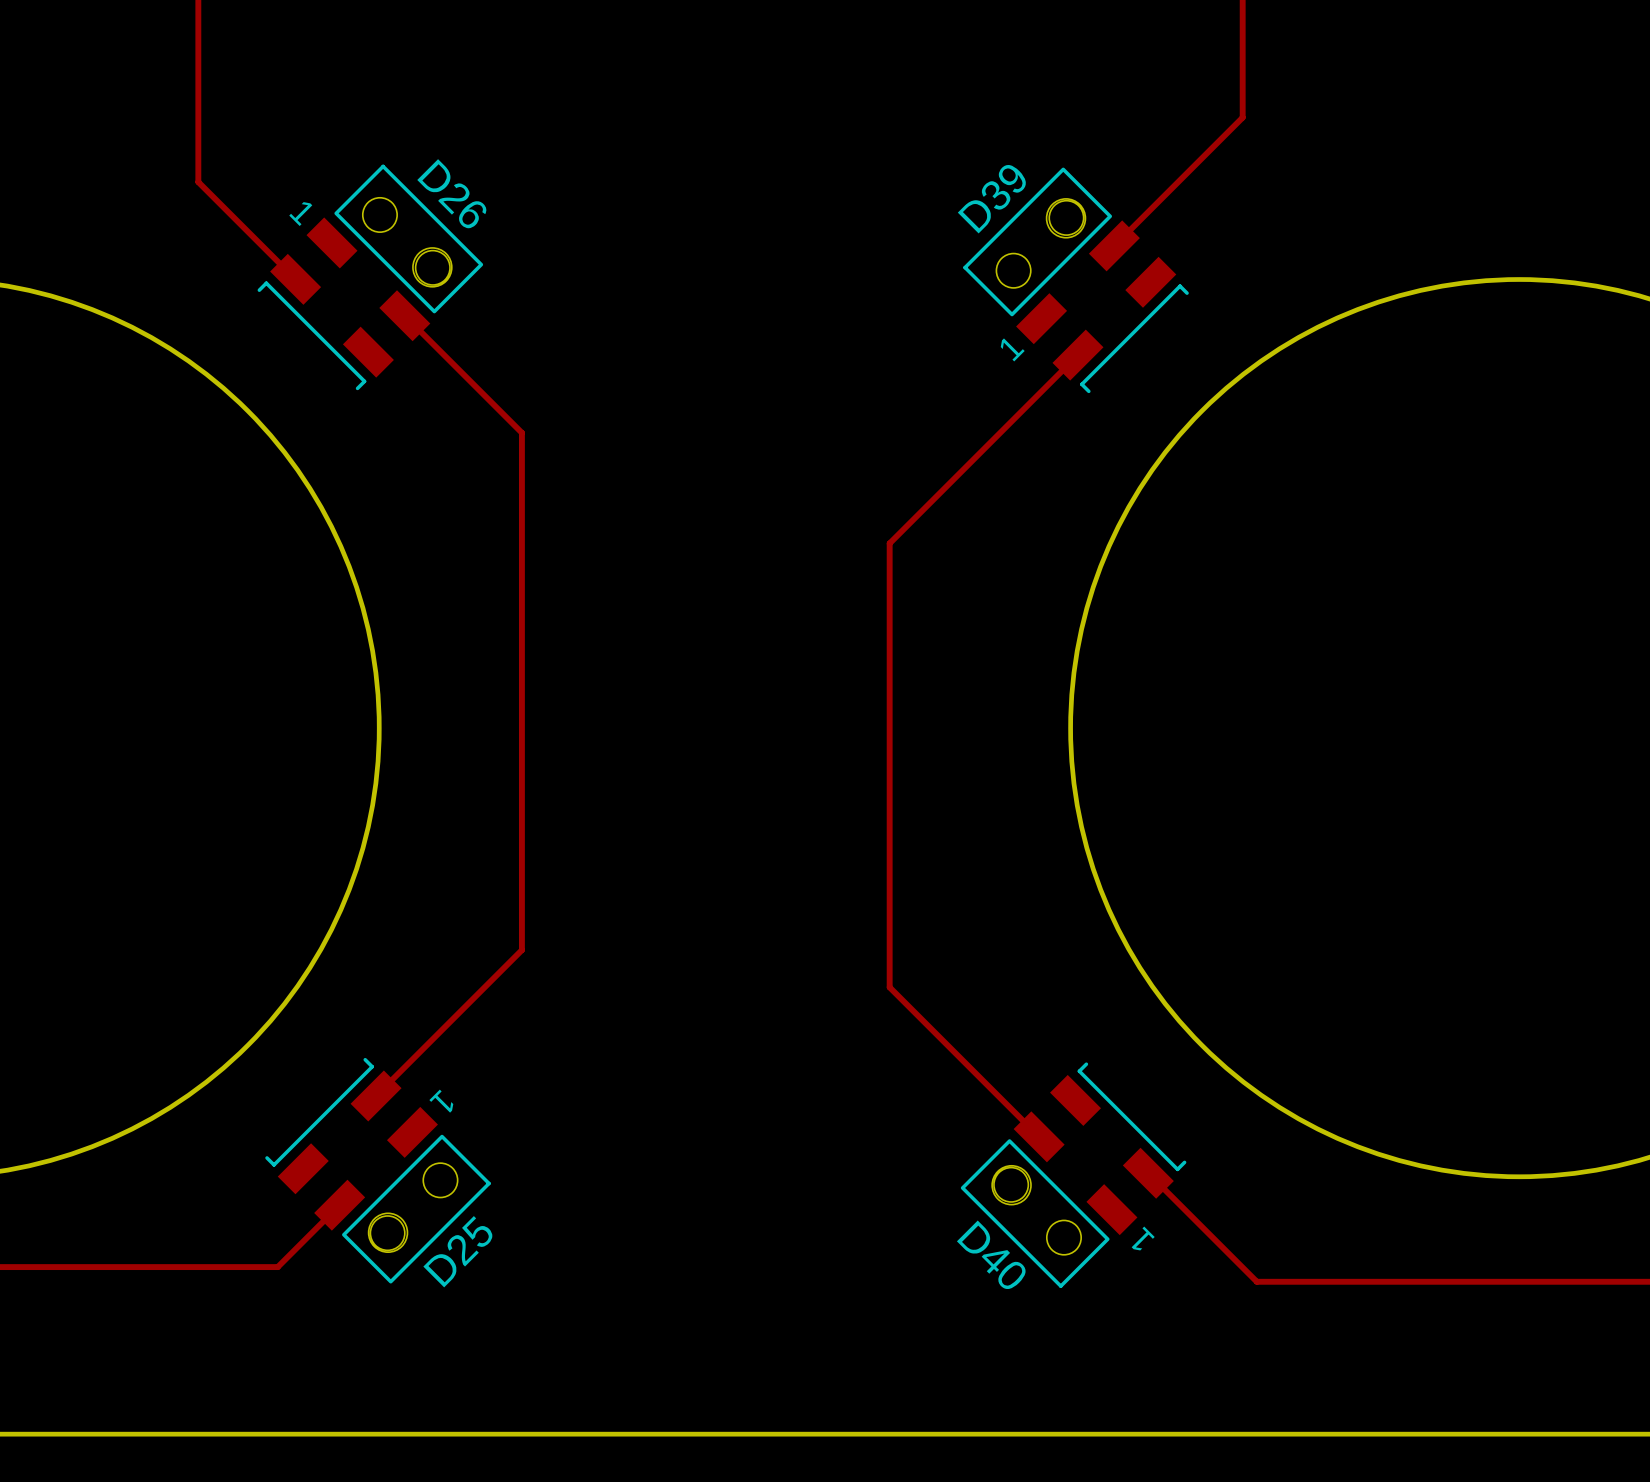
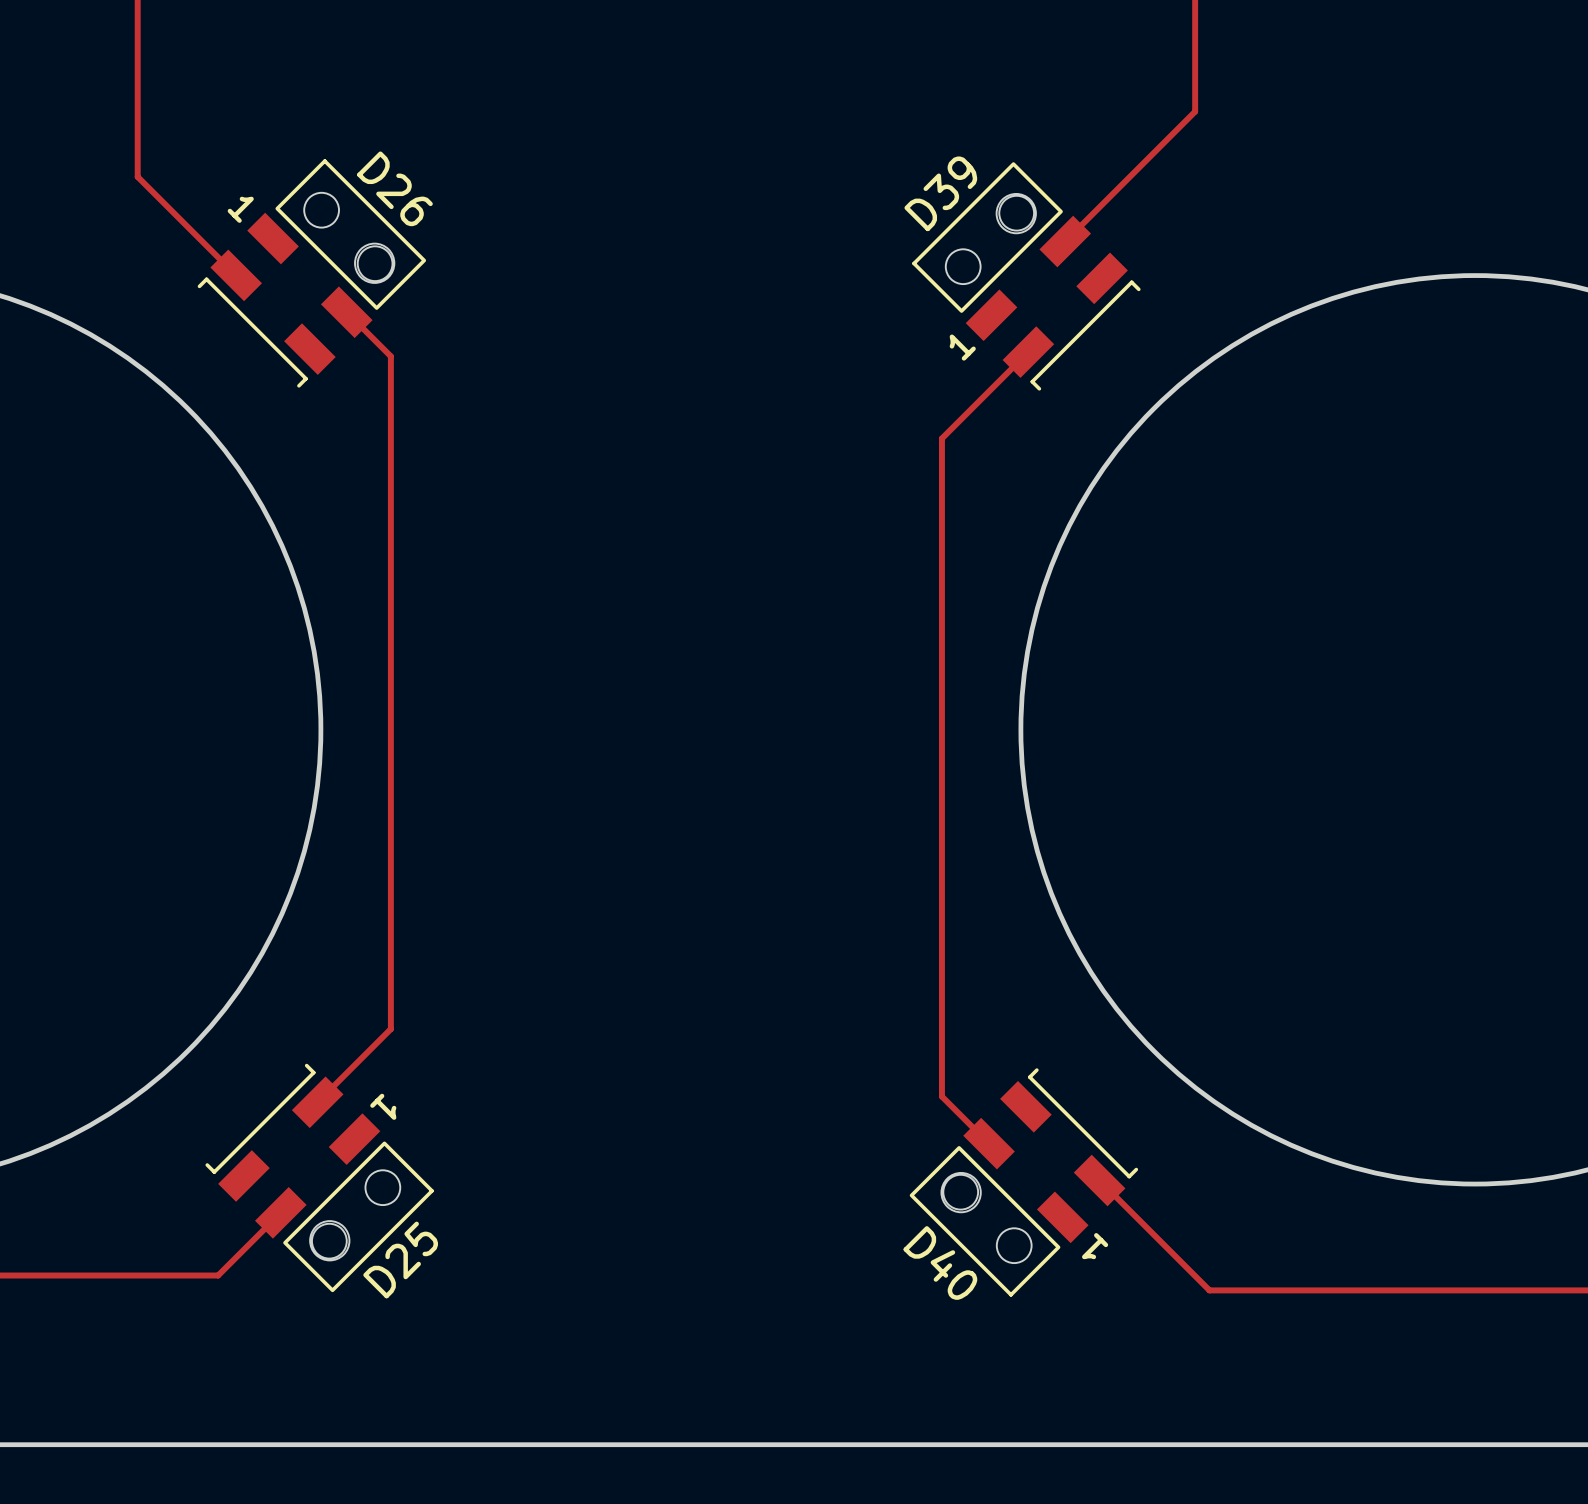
track: (448, 359) (521, 432) (521, 950) (448, 1023) -> (390, 356) (390, 1029)
track: (992, 440) (889, 543) (889, 987) (992, 1090) -> (941, 438) (941, 1096)

